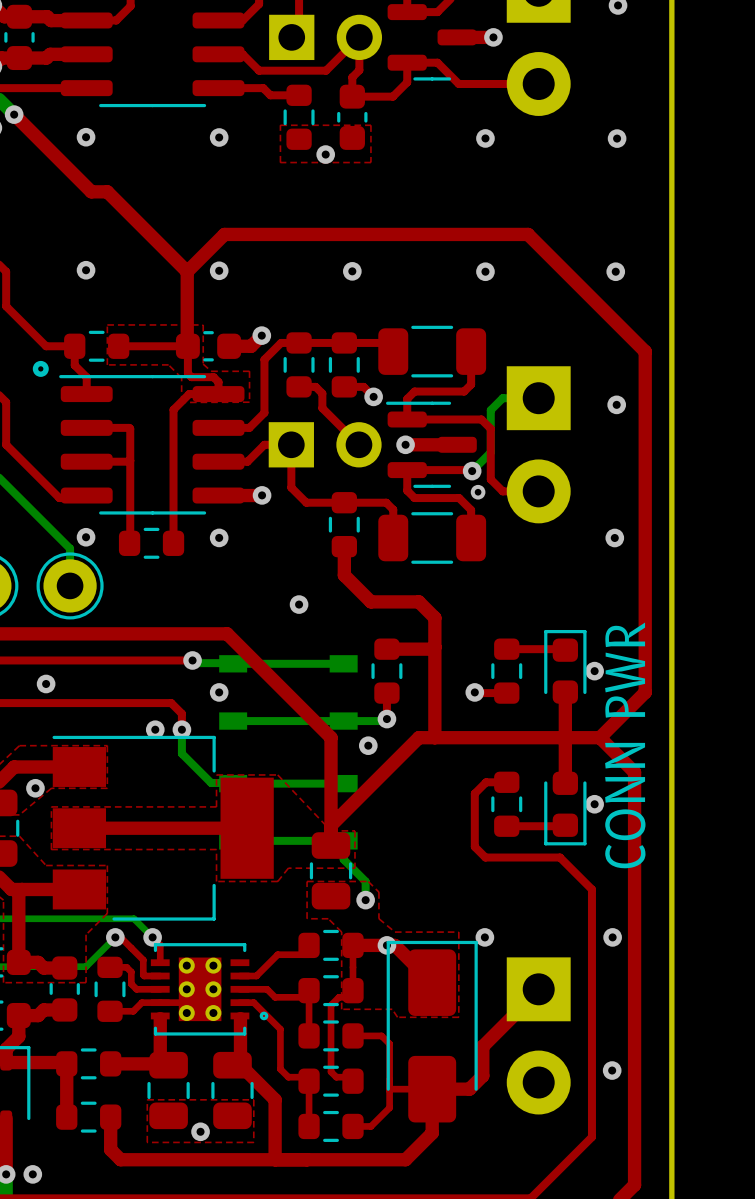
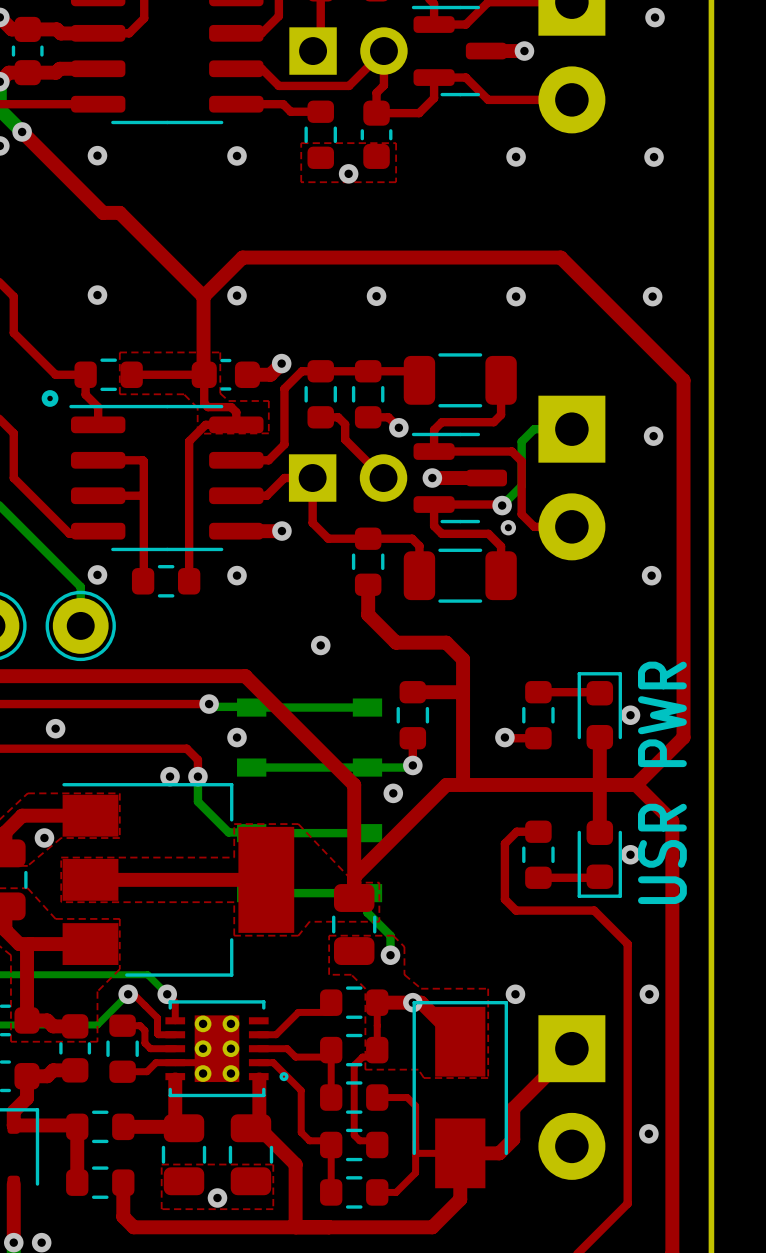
text: CONN (625, 805) -> USR (662, 853)
part footprint: [386, 940, 478, 1123] -> [412, 1000, 508, 1189]

